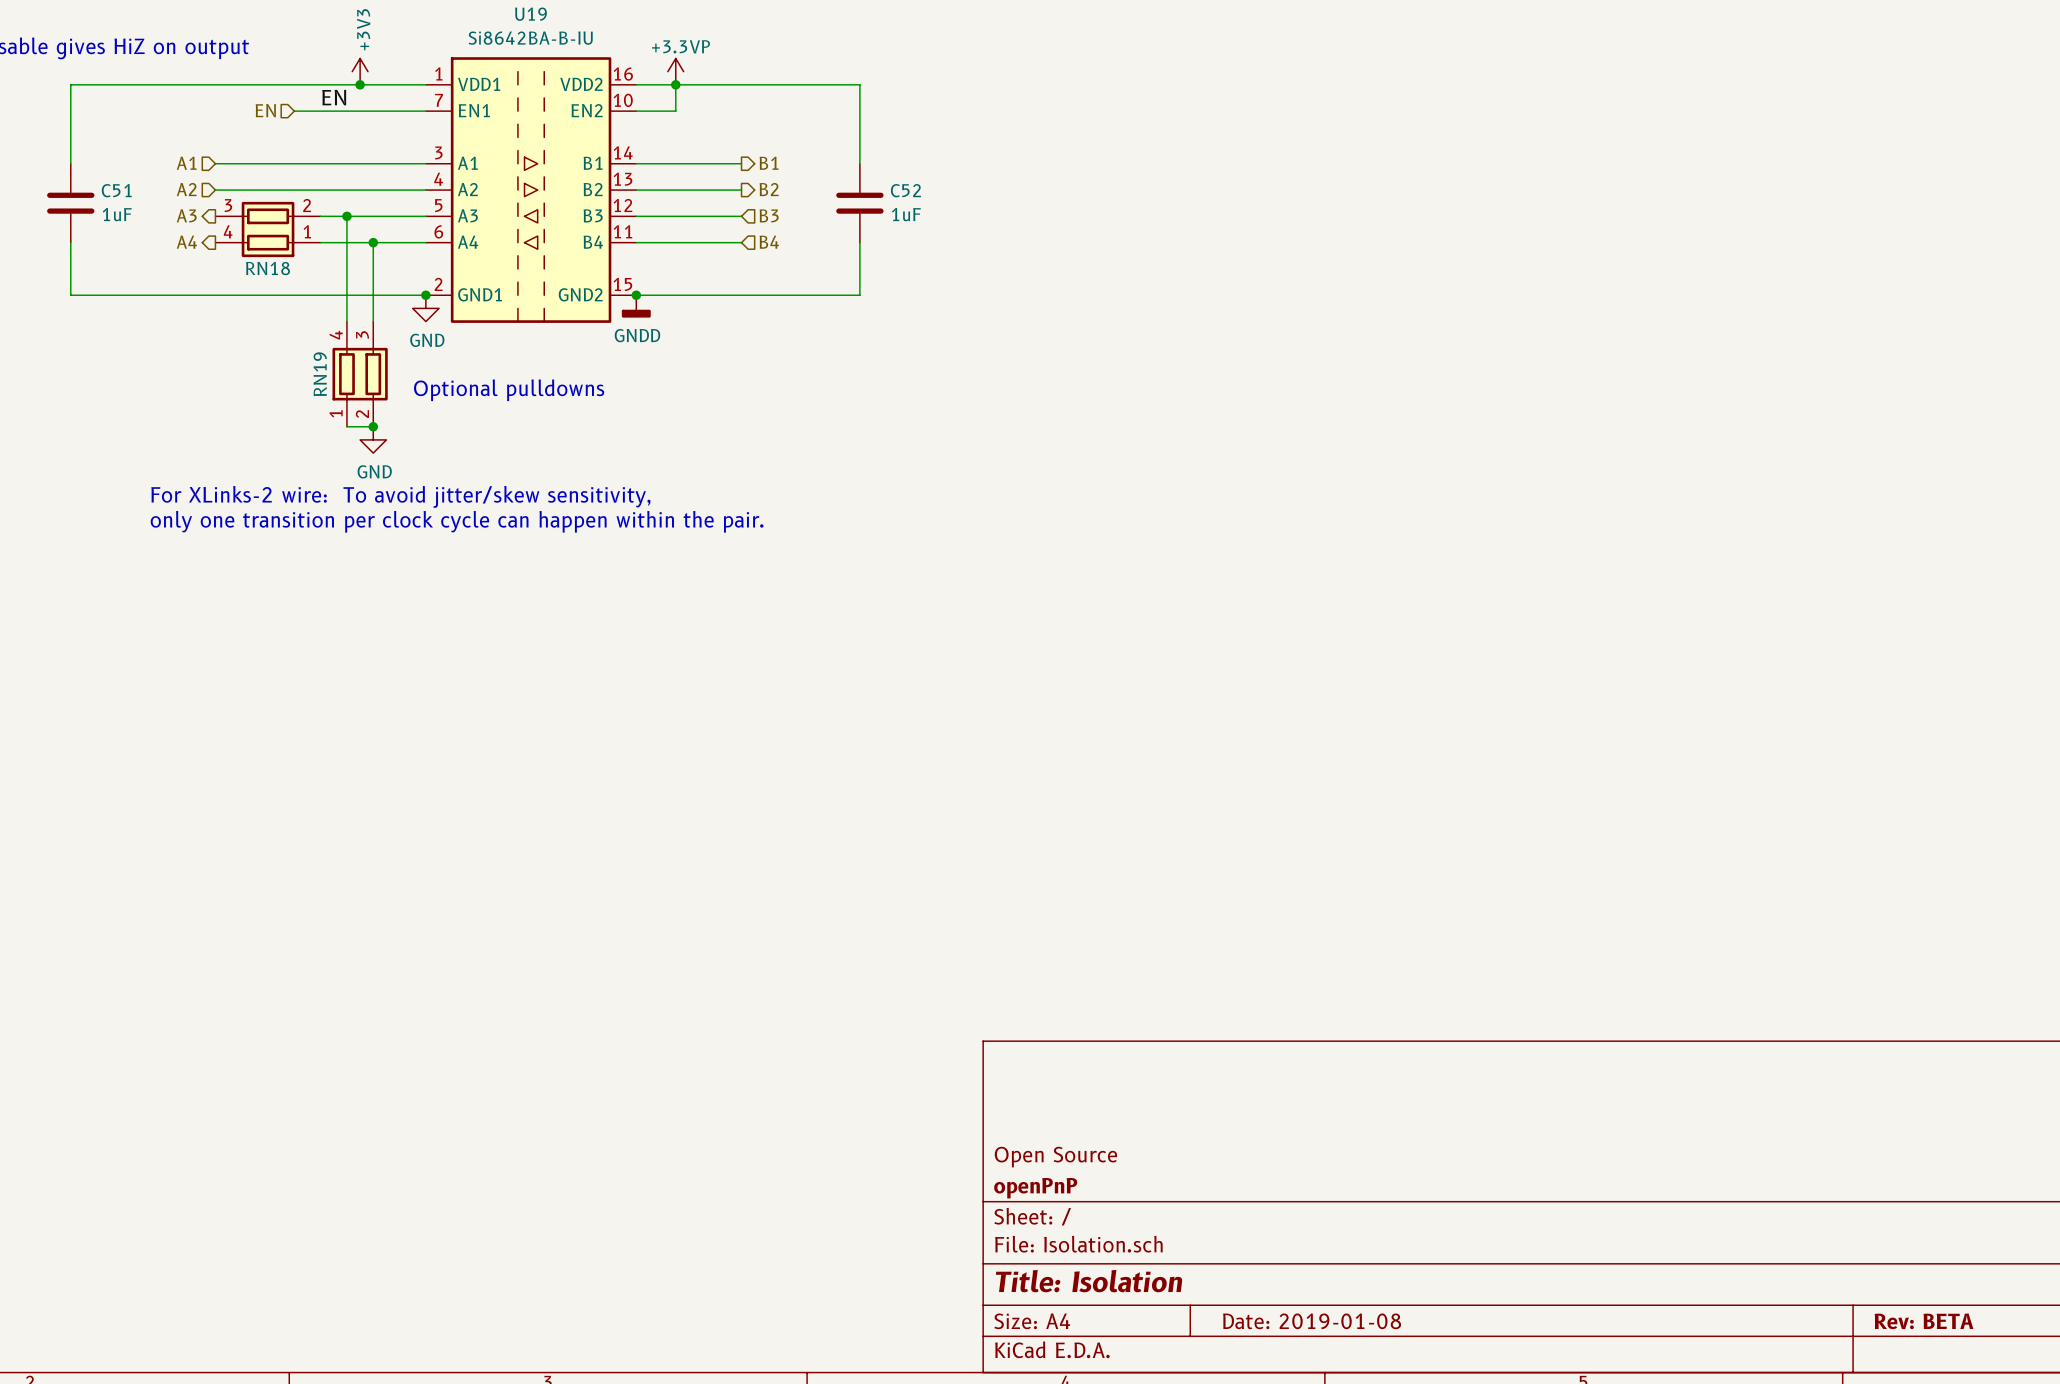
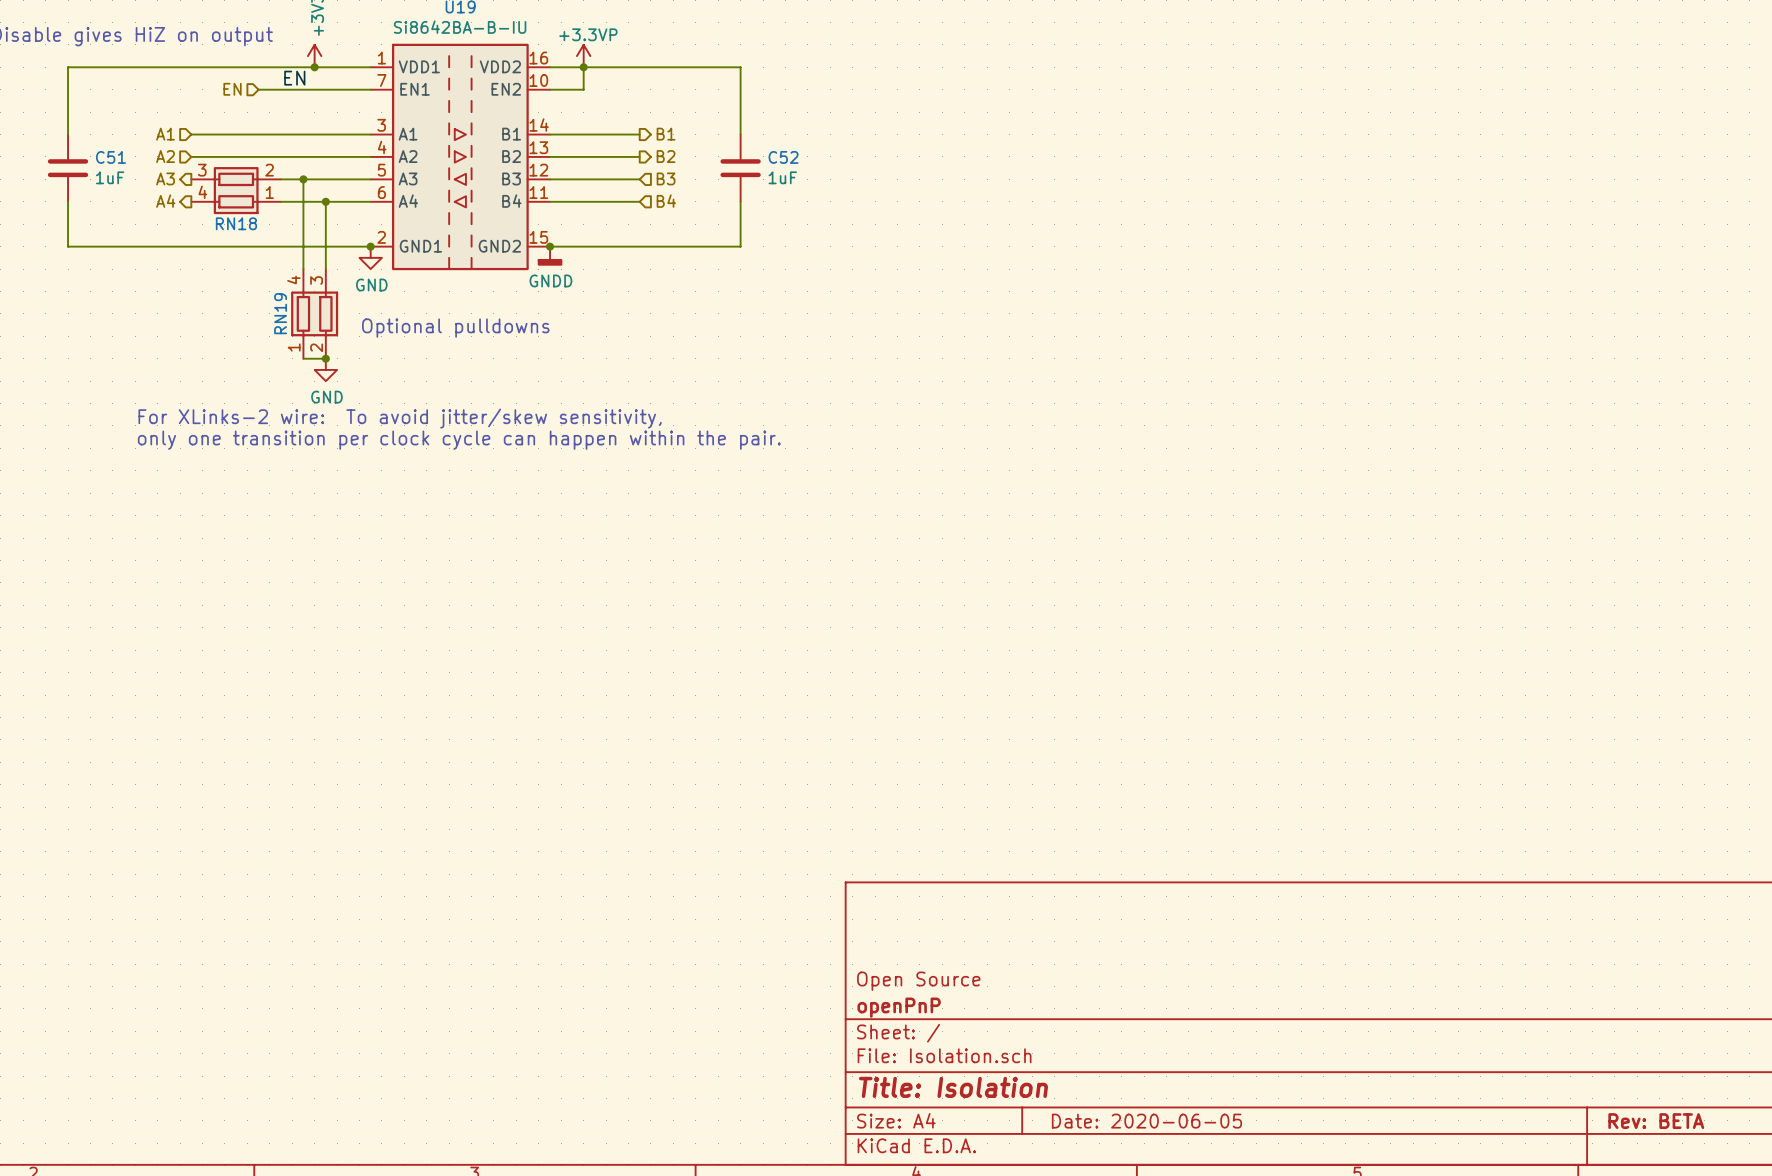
title block: Date: 2019-01-08 (1312, 1321) -> Date: 2020-06-05 (1146, 1121)

